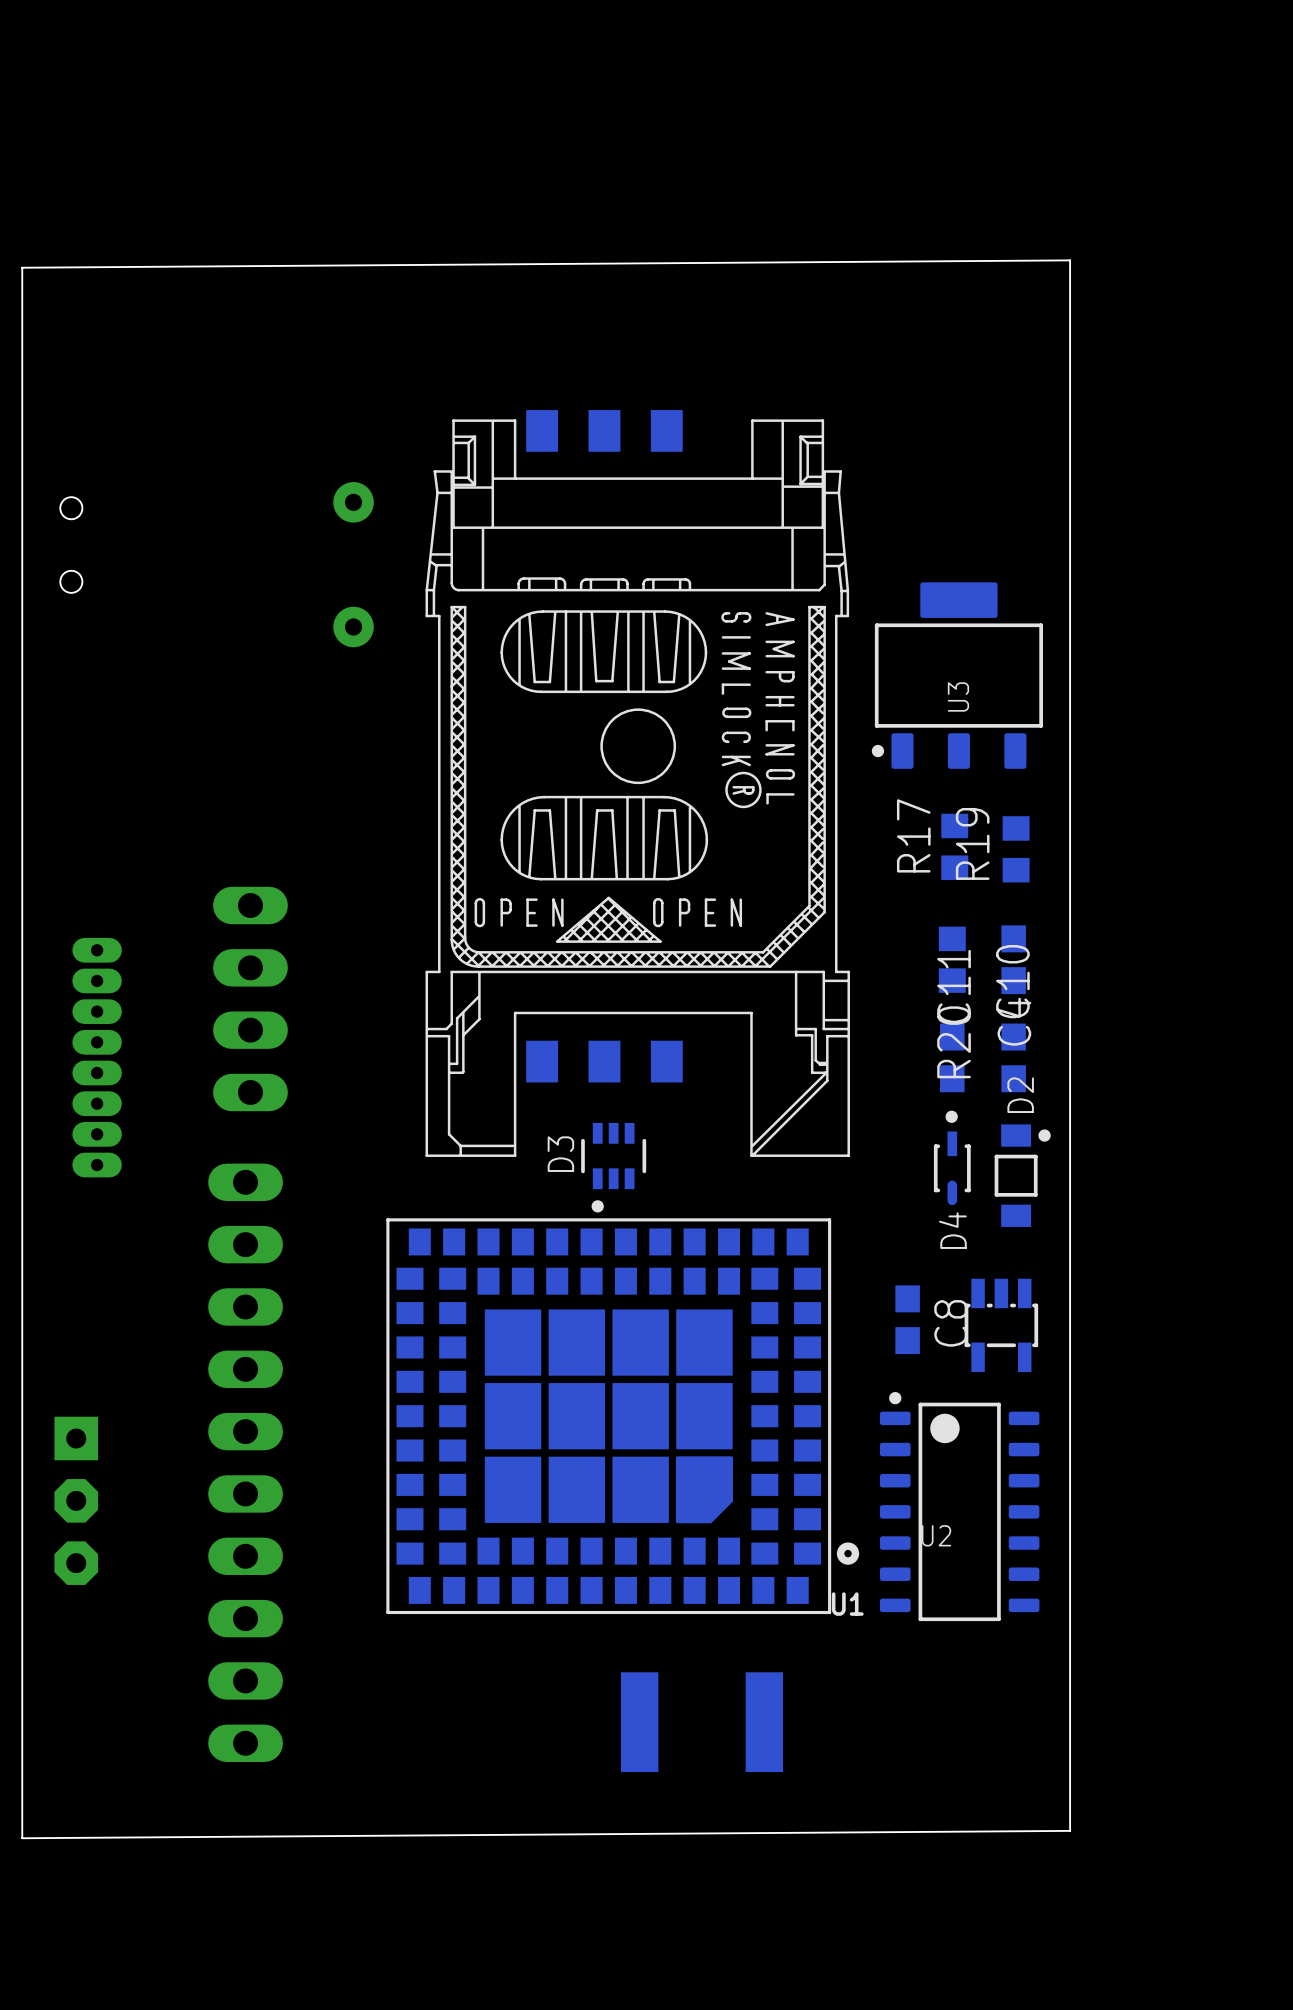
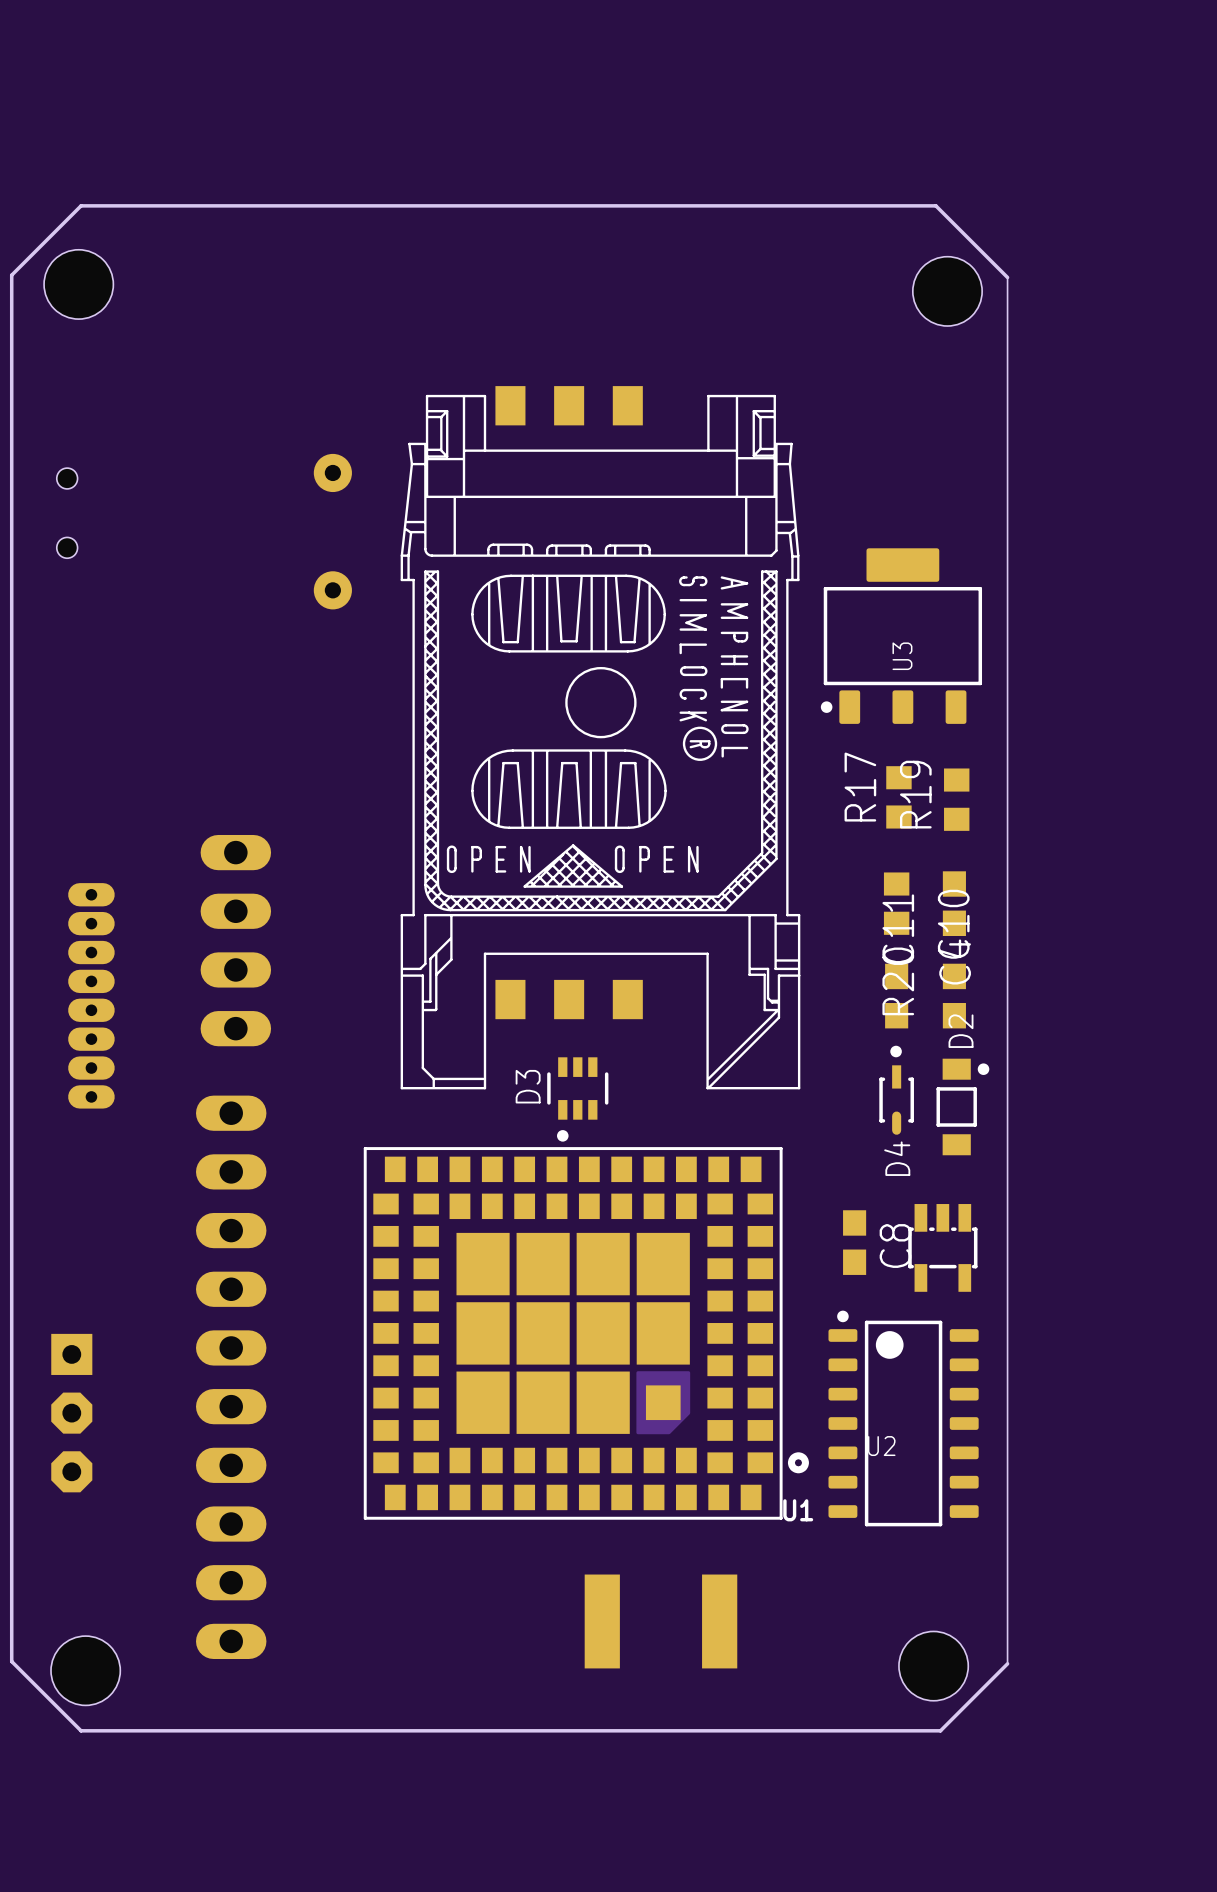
board edge: (1070, 294) (1070, 260) (22, 267) (22, 1838) (1070, 1830) (1070, 1767) -> (1007, 277) (935, 205) (81, 205) (11, 275) (11, 1661) (81, 1730) (940, 1730) (1007, 1663)
hole: none -> (78, 284)
hole: none -> (947, 291)
hole: none -> (933, 1666)
hole: none -> (85, 1670)

